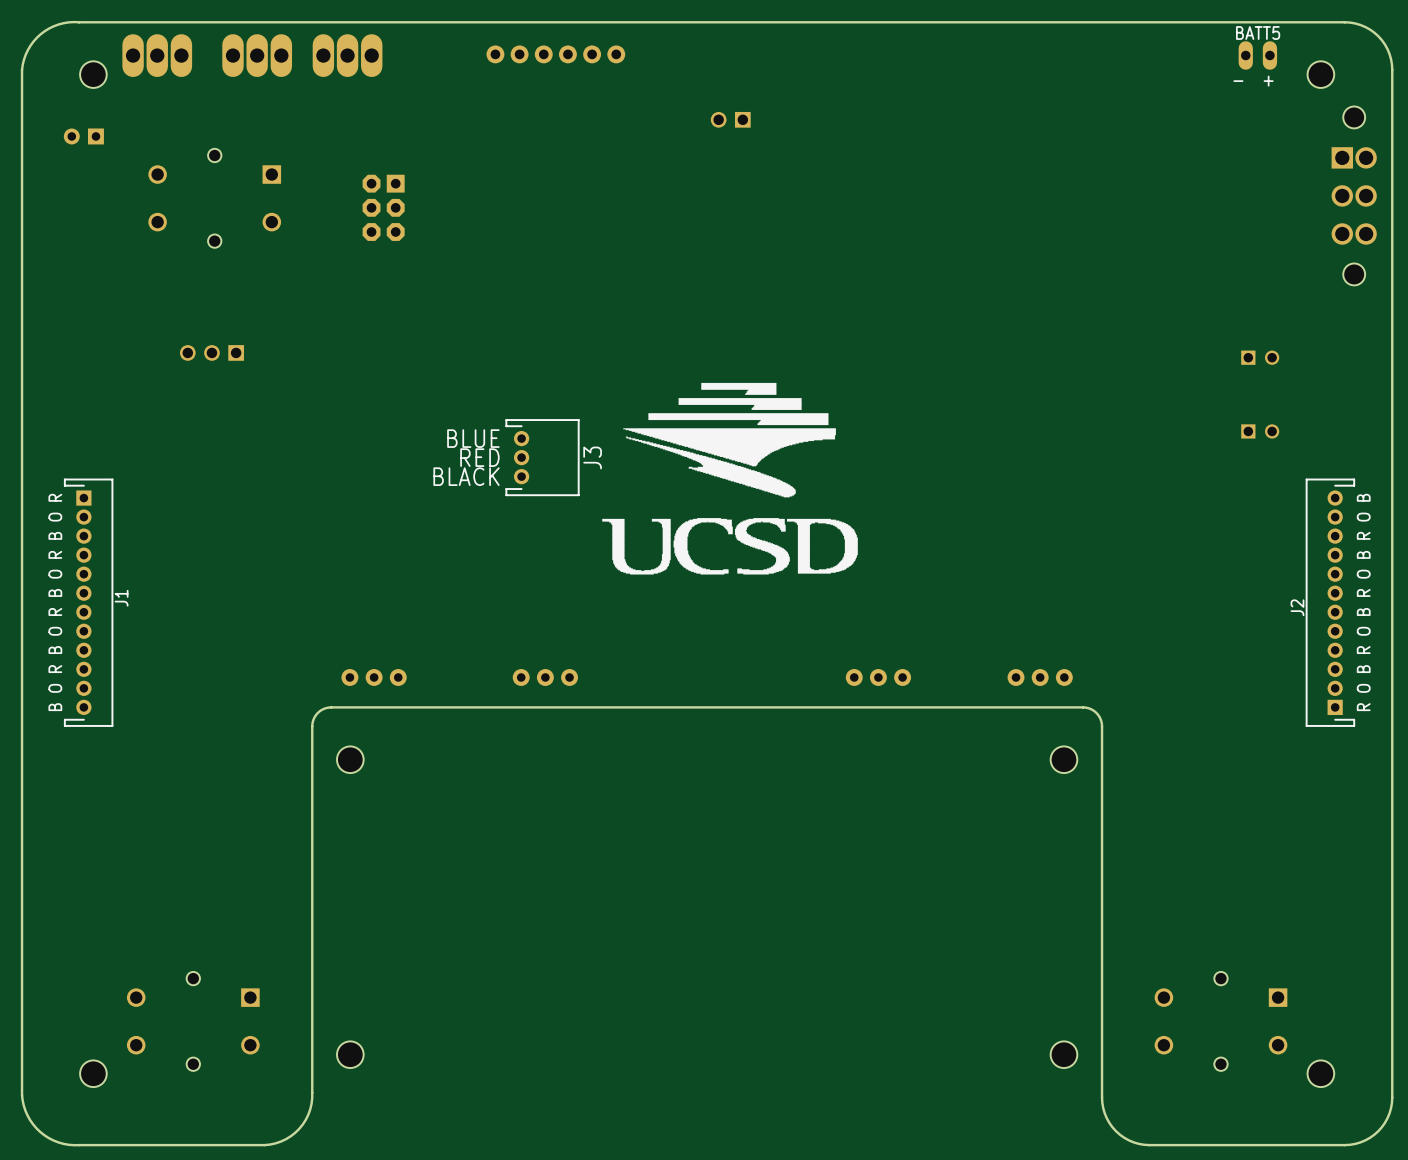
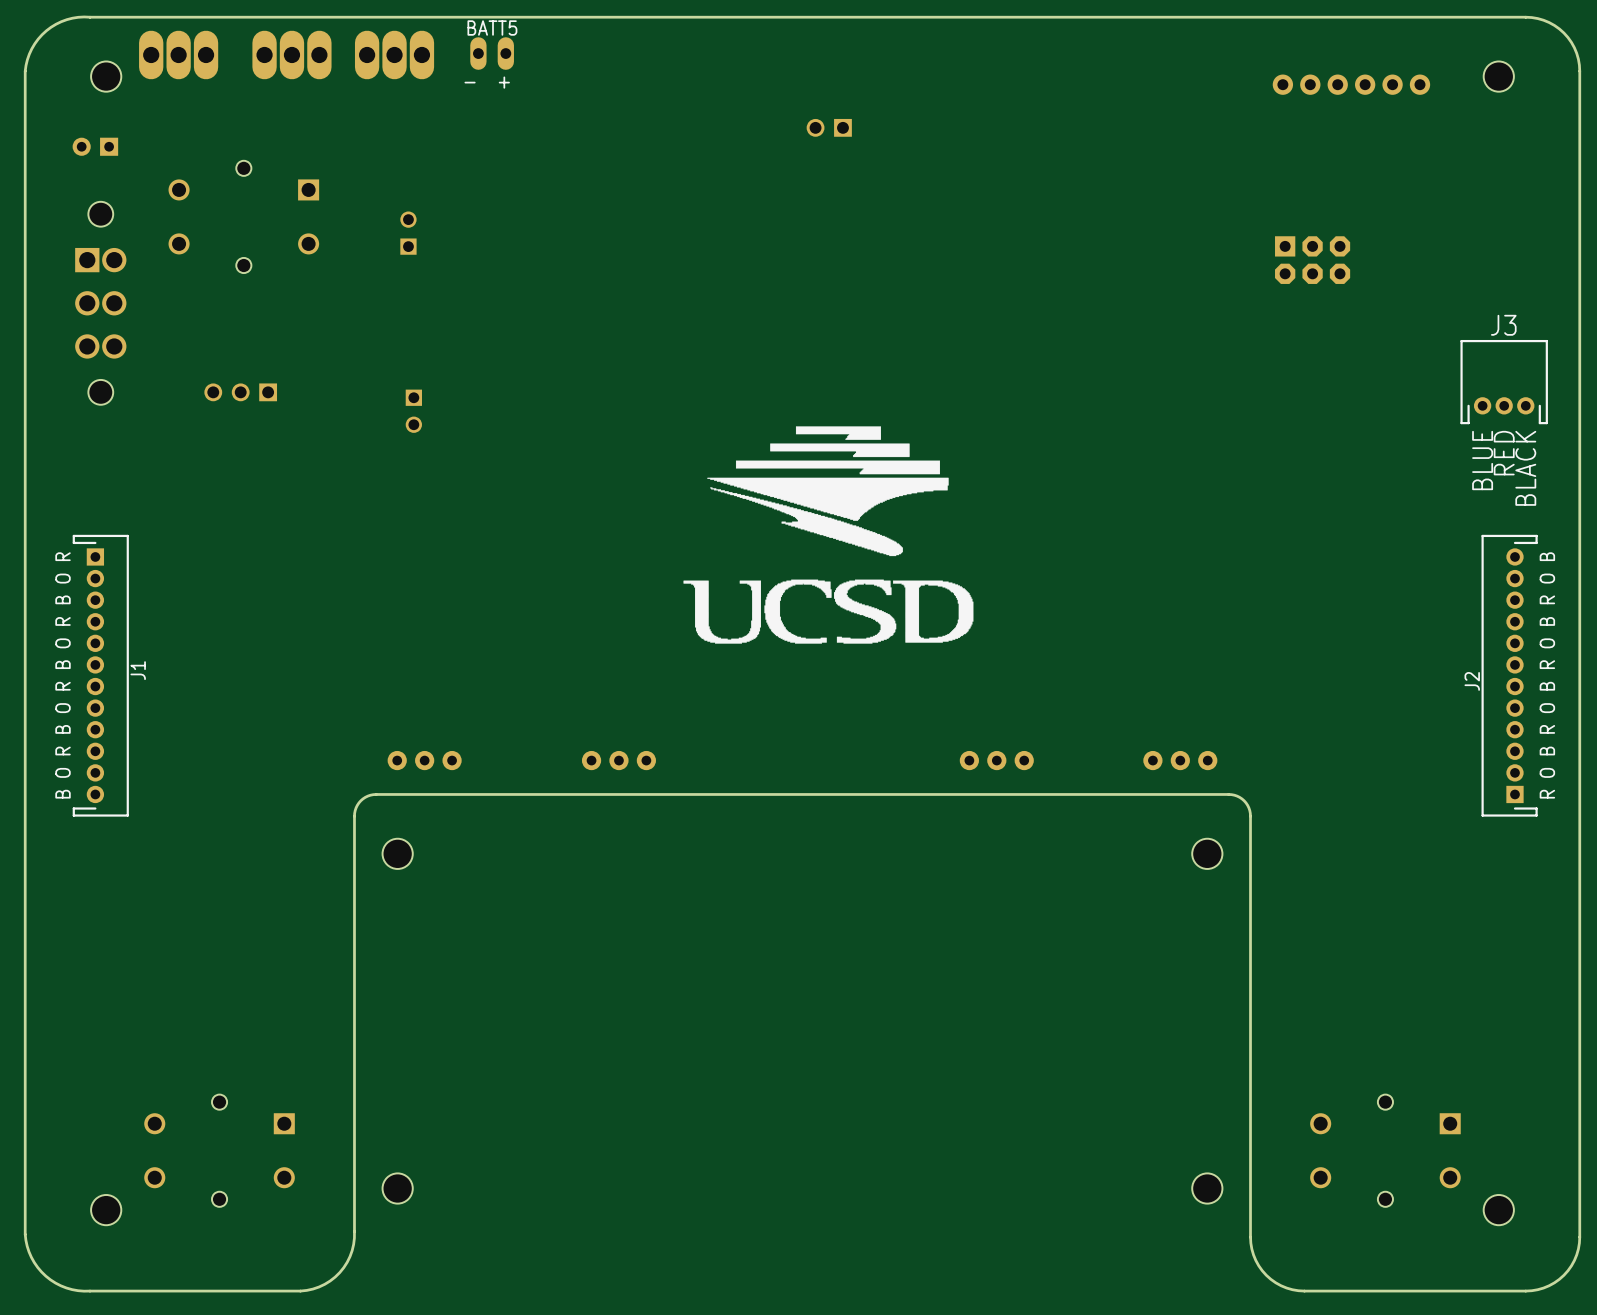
BATT5 footprint: [1238, 41, 1278, 70] -> [470, 37, 514, 70]
part: (555, 54) -> none
part: none -> (1351, 84)
part: (1354, 195) -> none
part: (383, 207) -> none
part: none -> (408, 233)
part: none -> (1312, 260)
part: none -> (100, 303)
part: (1260, 357) -> none
part: none -> (413, 411)
part: (1260, 431) -> none
J3 rotation: 0° (542, 457) -> 90° counterclockwise (1504, 382)
J3 position: (542, 457) -> (1504, 382)

